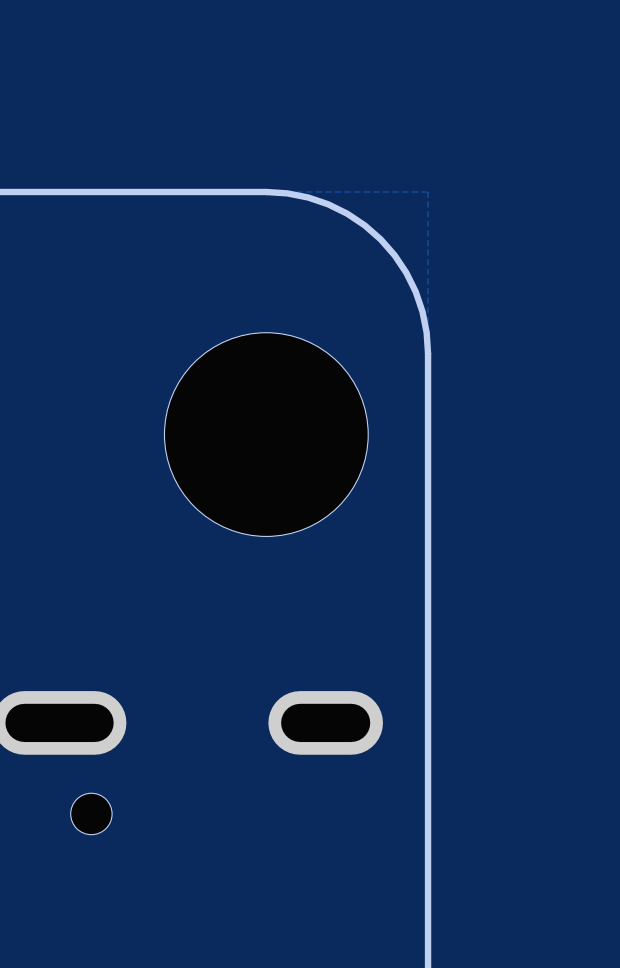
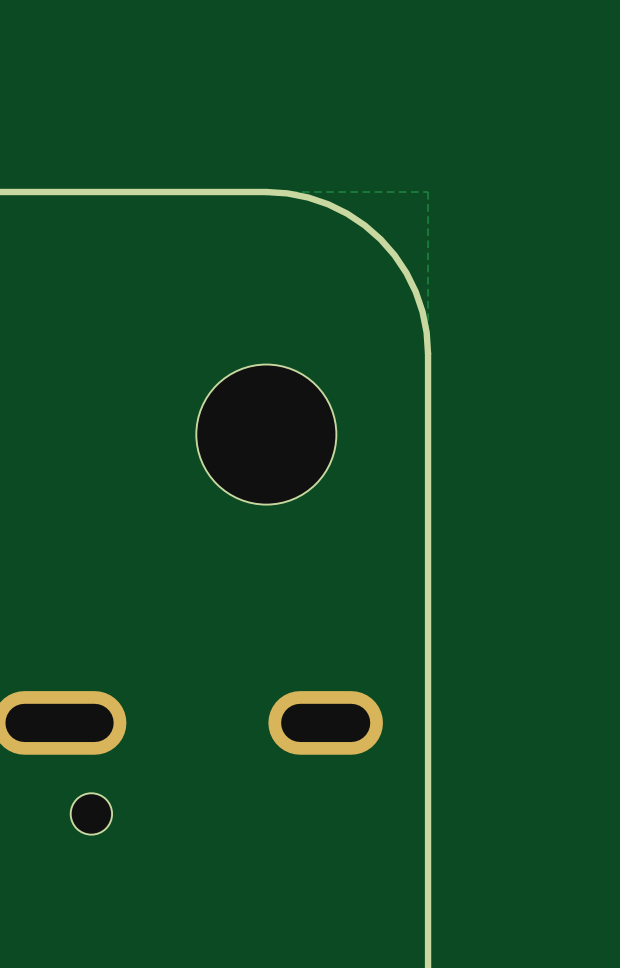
part footprint: [164, 332, 369, 537] -> [196, 364, 337, 505]

